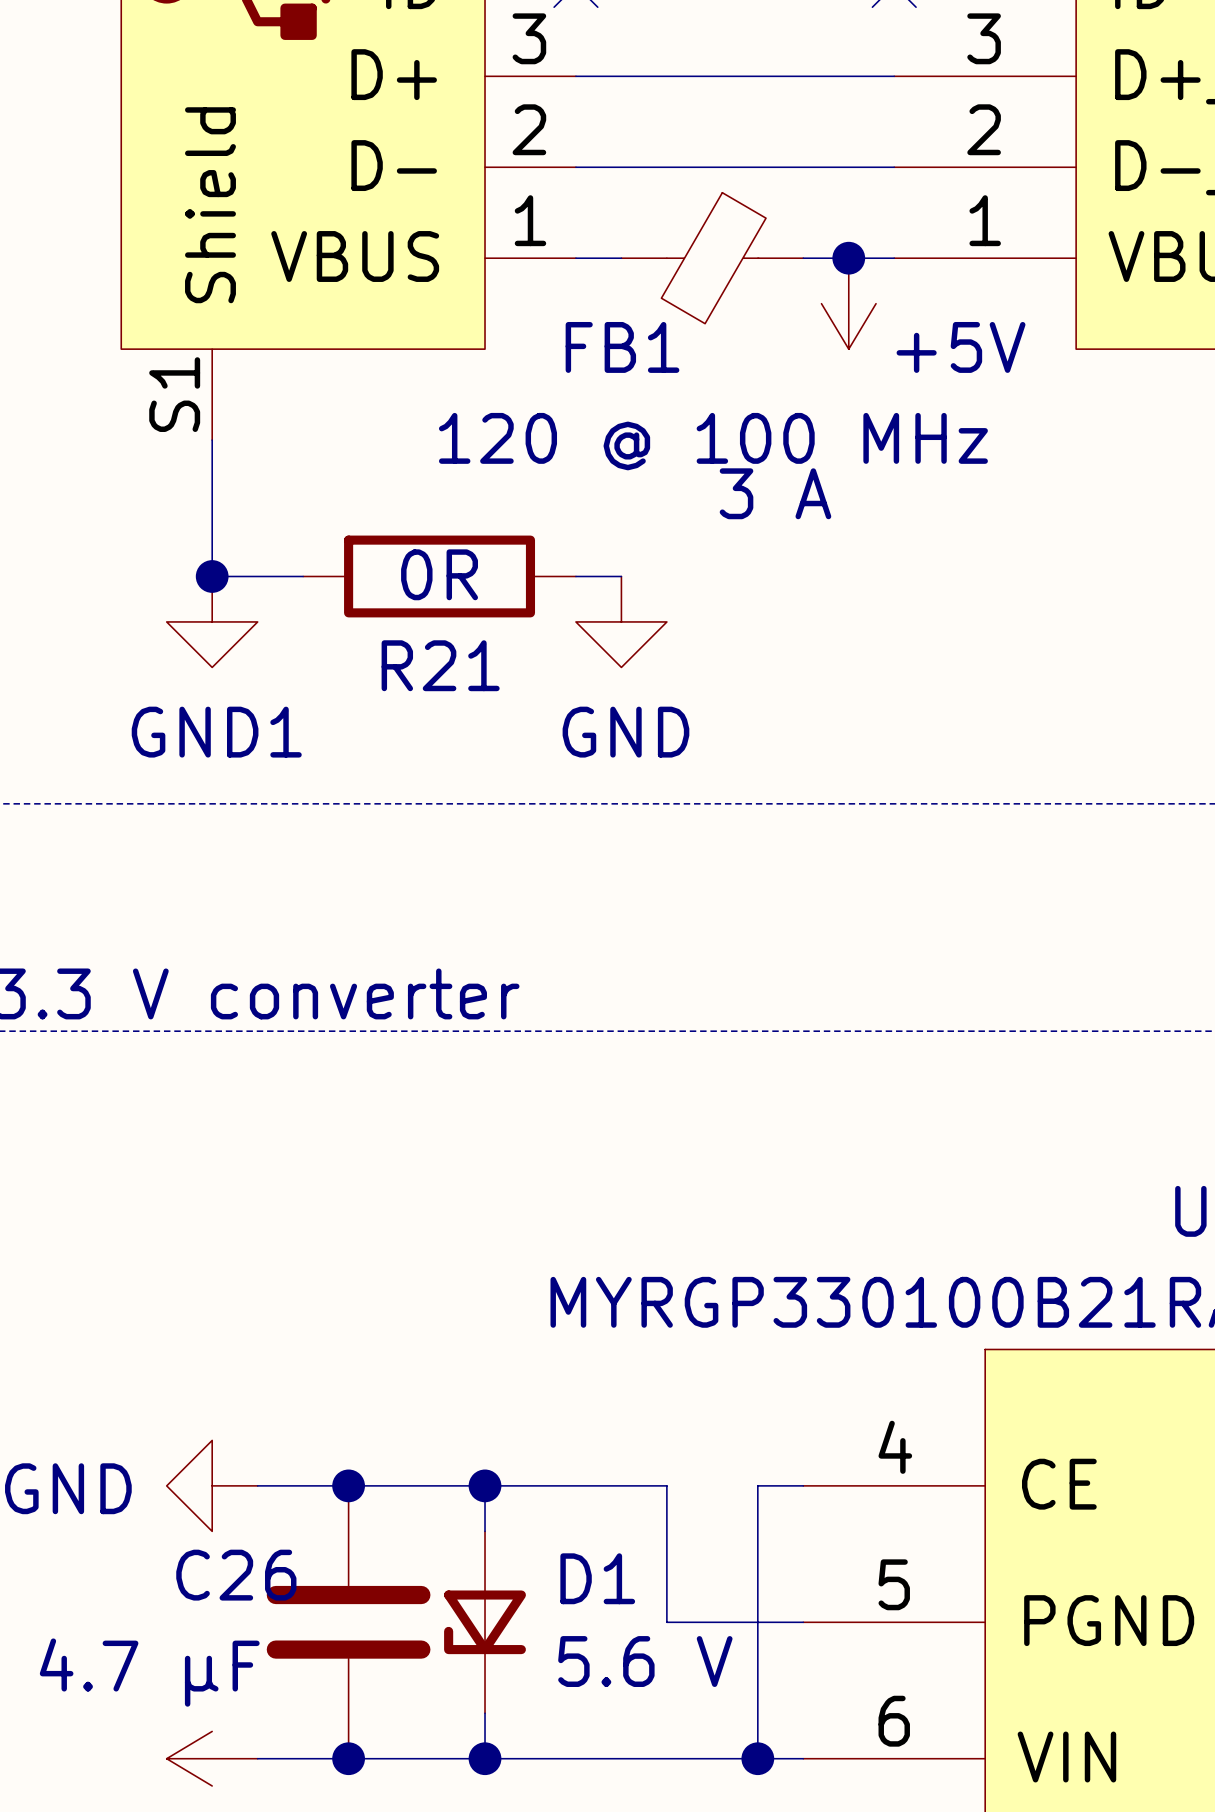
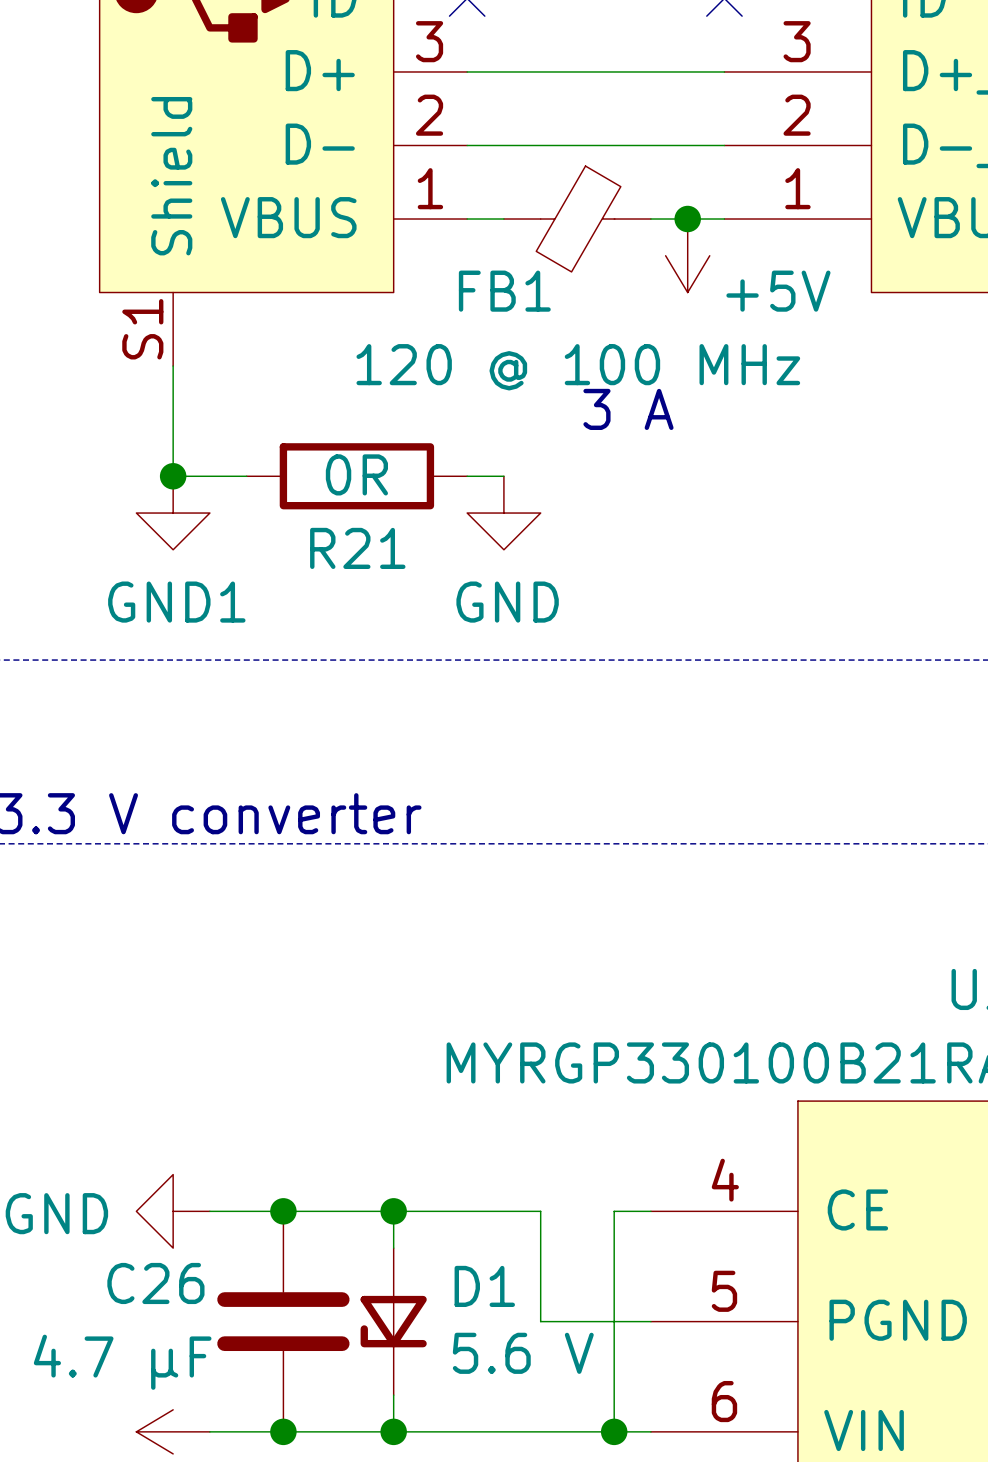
C26 name position: C26 (236, 1575) -> C26 (155, 1283)

